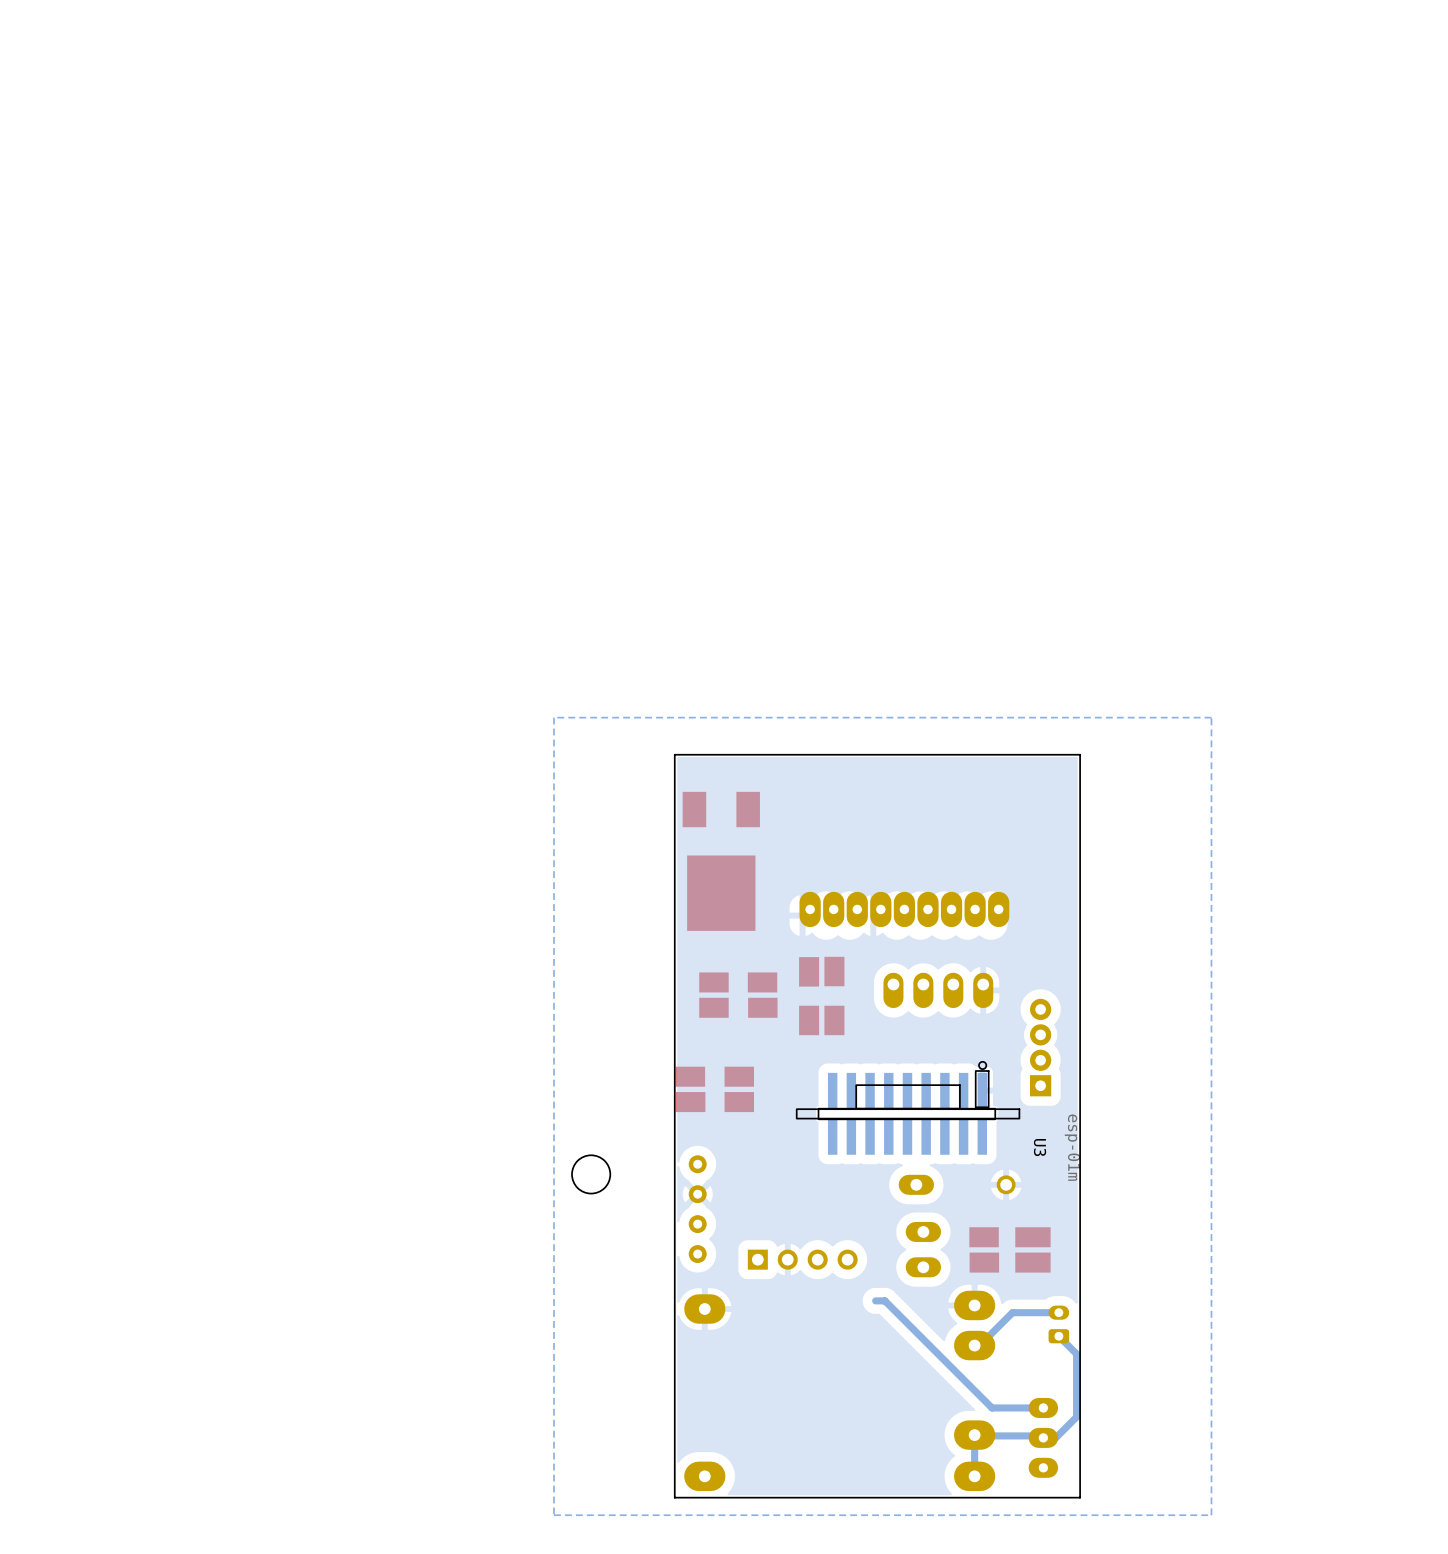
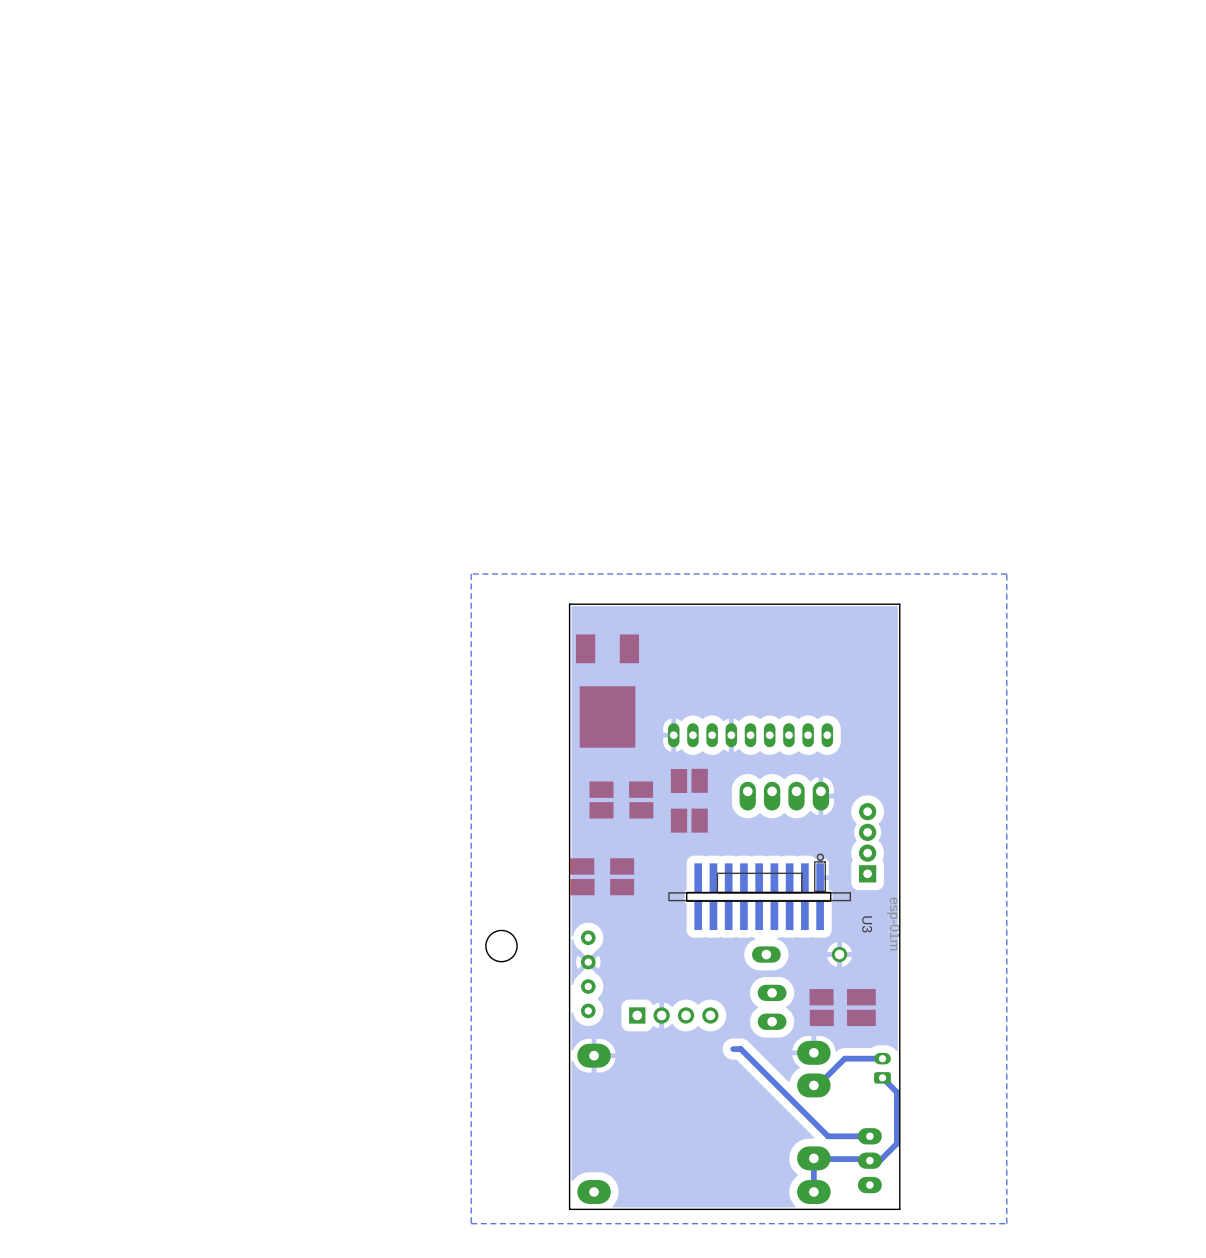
part footprint: [799, 891, 1010, 928] -> [667, 723, 834, 748]

